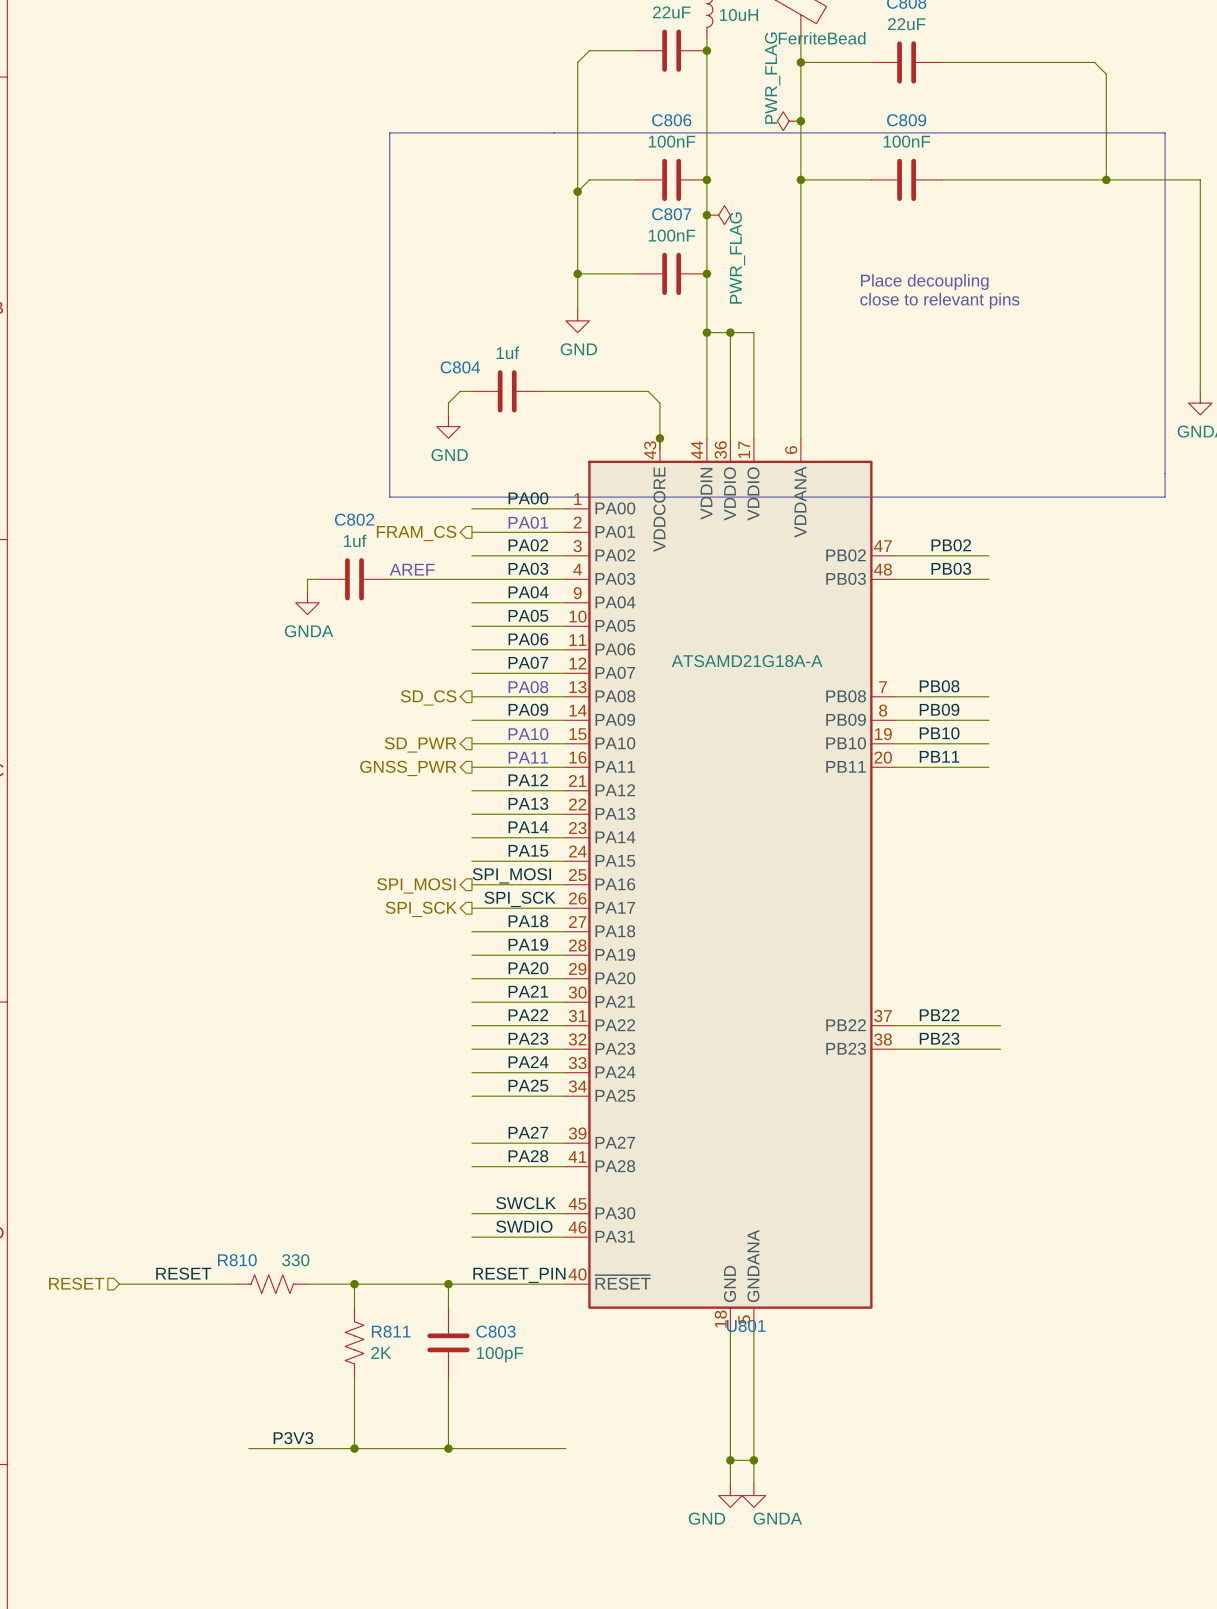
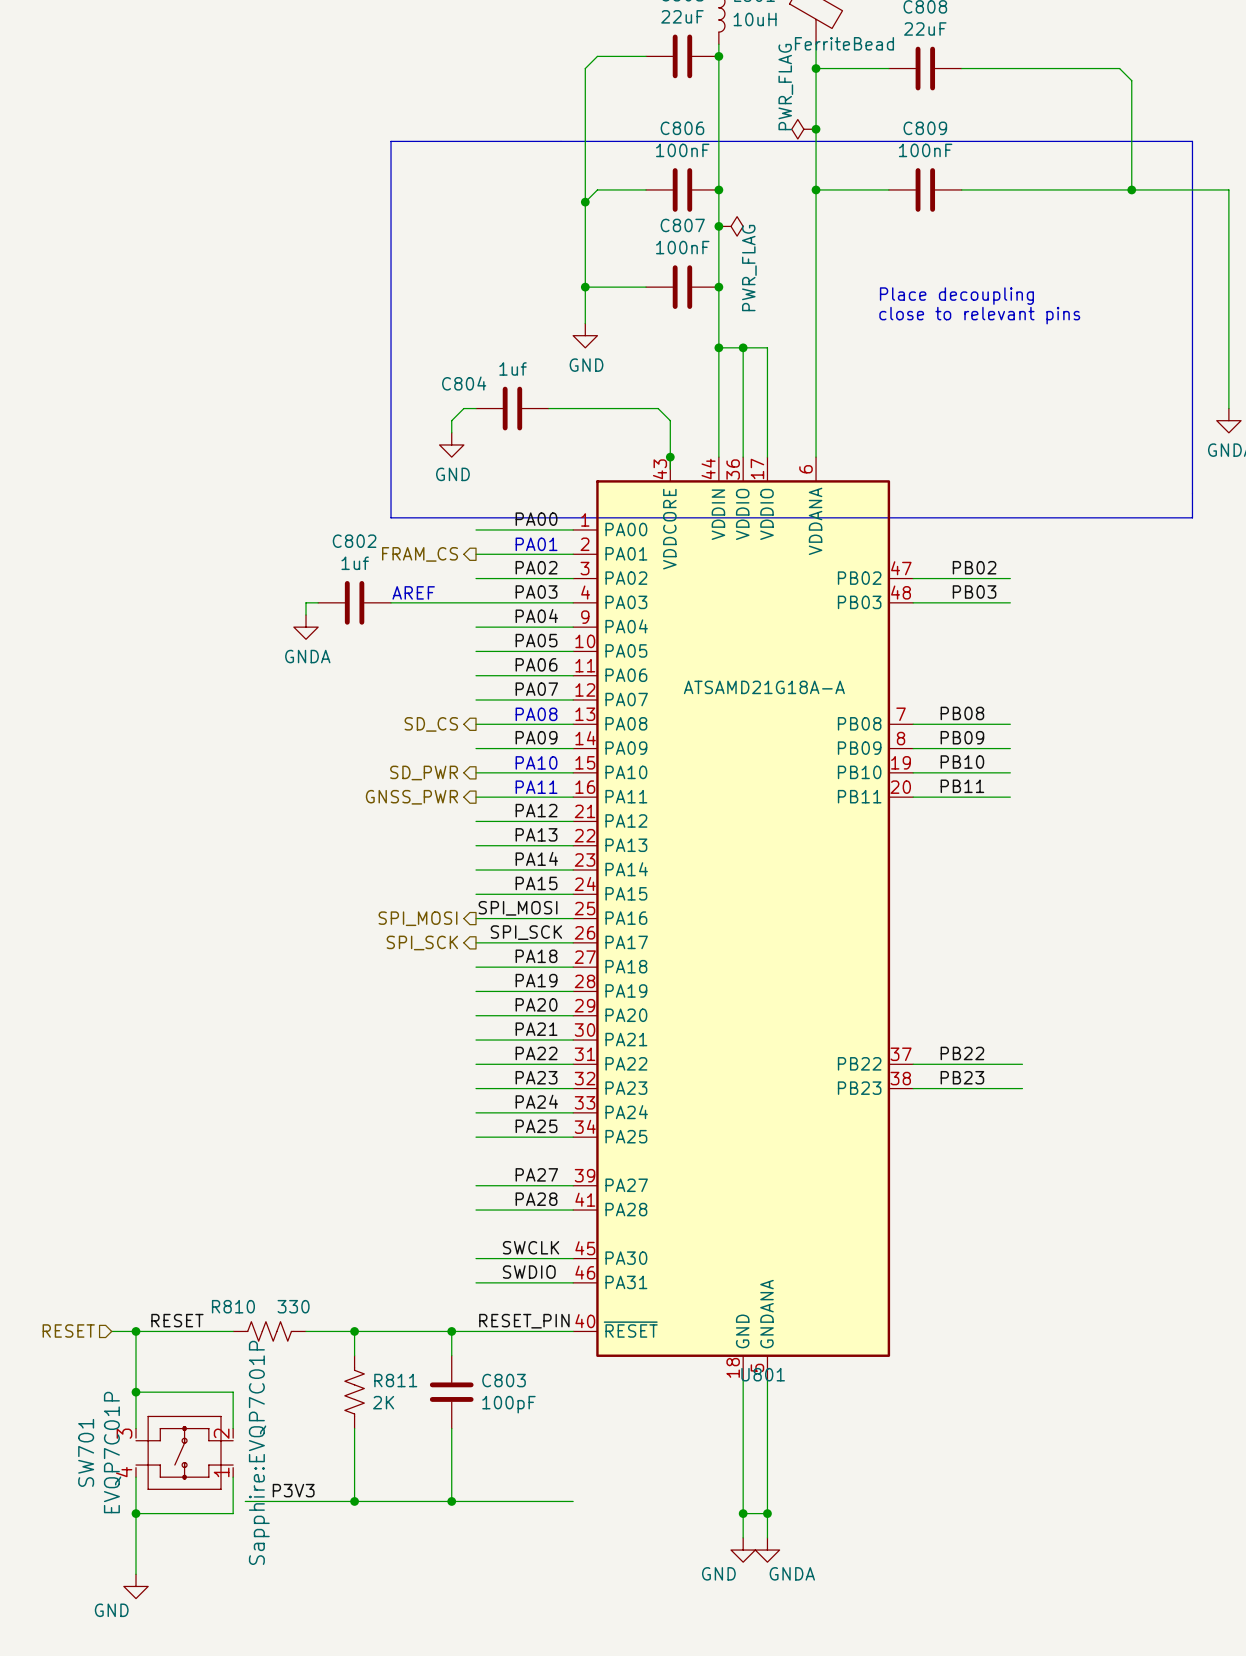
wire: none -> (136, 1331) (136, 1428)
junction: none -> (136, 1331)
wire: none -> (136, 1392) (233, 1392) (233, 1428)
junction: none -> (136, 1392)
SW701: none -> EVQP7C01P (184, 1452)
wire: none -> (136, 1477) (136, 1574)
wire: none -> (233, 1477) (233, 1513) (136, 1513)
junction: none -> (136, 1513)
power symbol: none -> GND (136, 1586)

